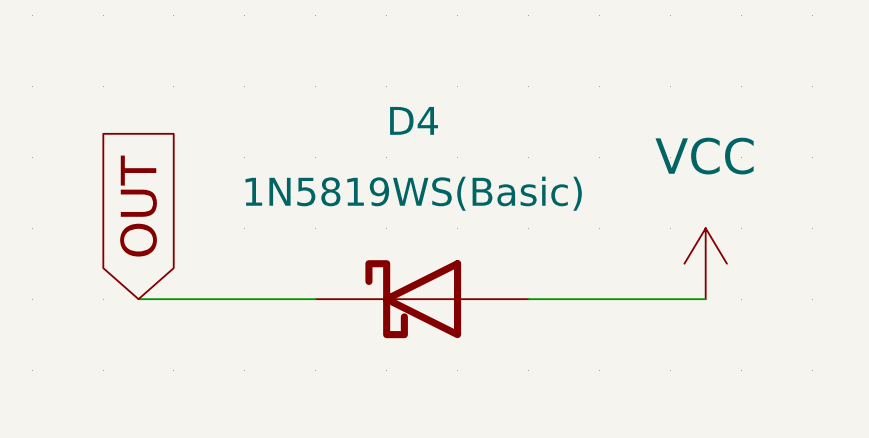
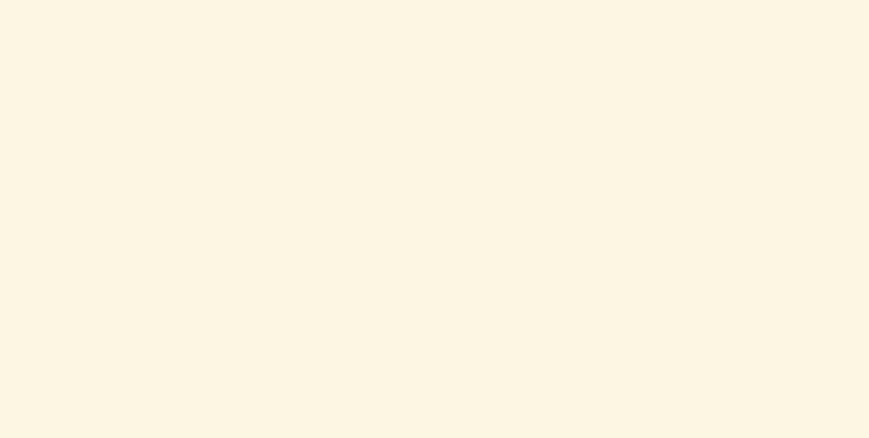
global label: OUT (138, 206) -> none
power symbol: VCC (705, 263) -> none
wire: (138, 299) (315, 299) -> none
D4: 1N5819WS(Basic) (422, 299) -> none
wire: (528, 299) (705, 299) -> none

